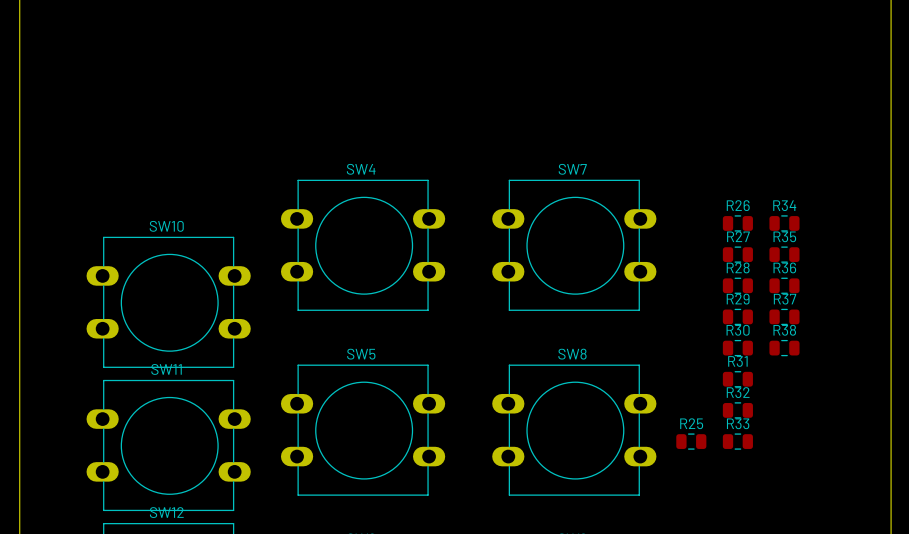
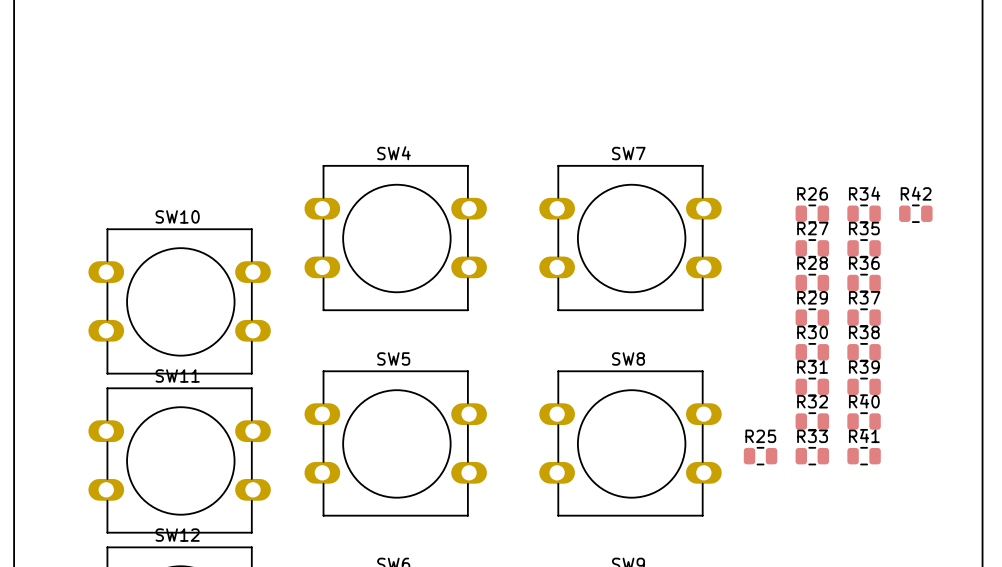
R42: none -> (915, 213)
R39: none -> (864, 386)
R40: none -> (864, 421)
R41: none -> (864, 456)

